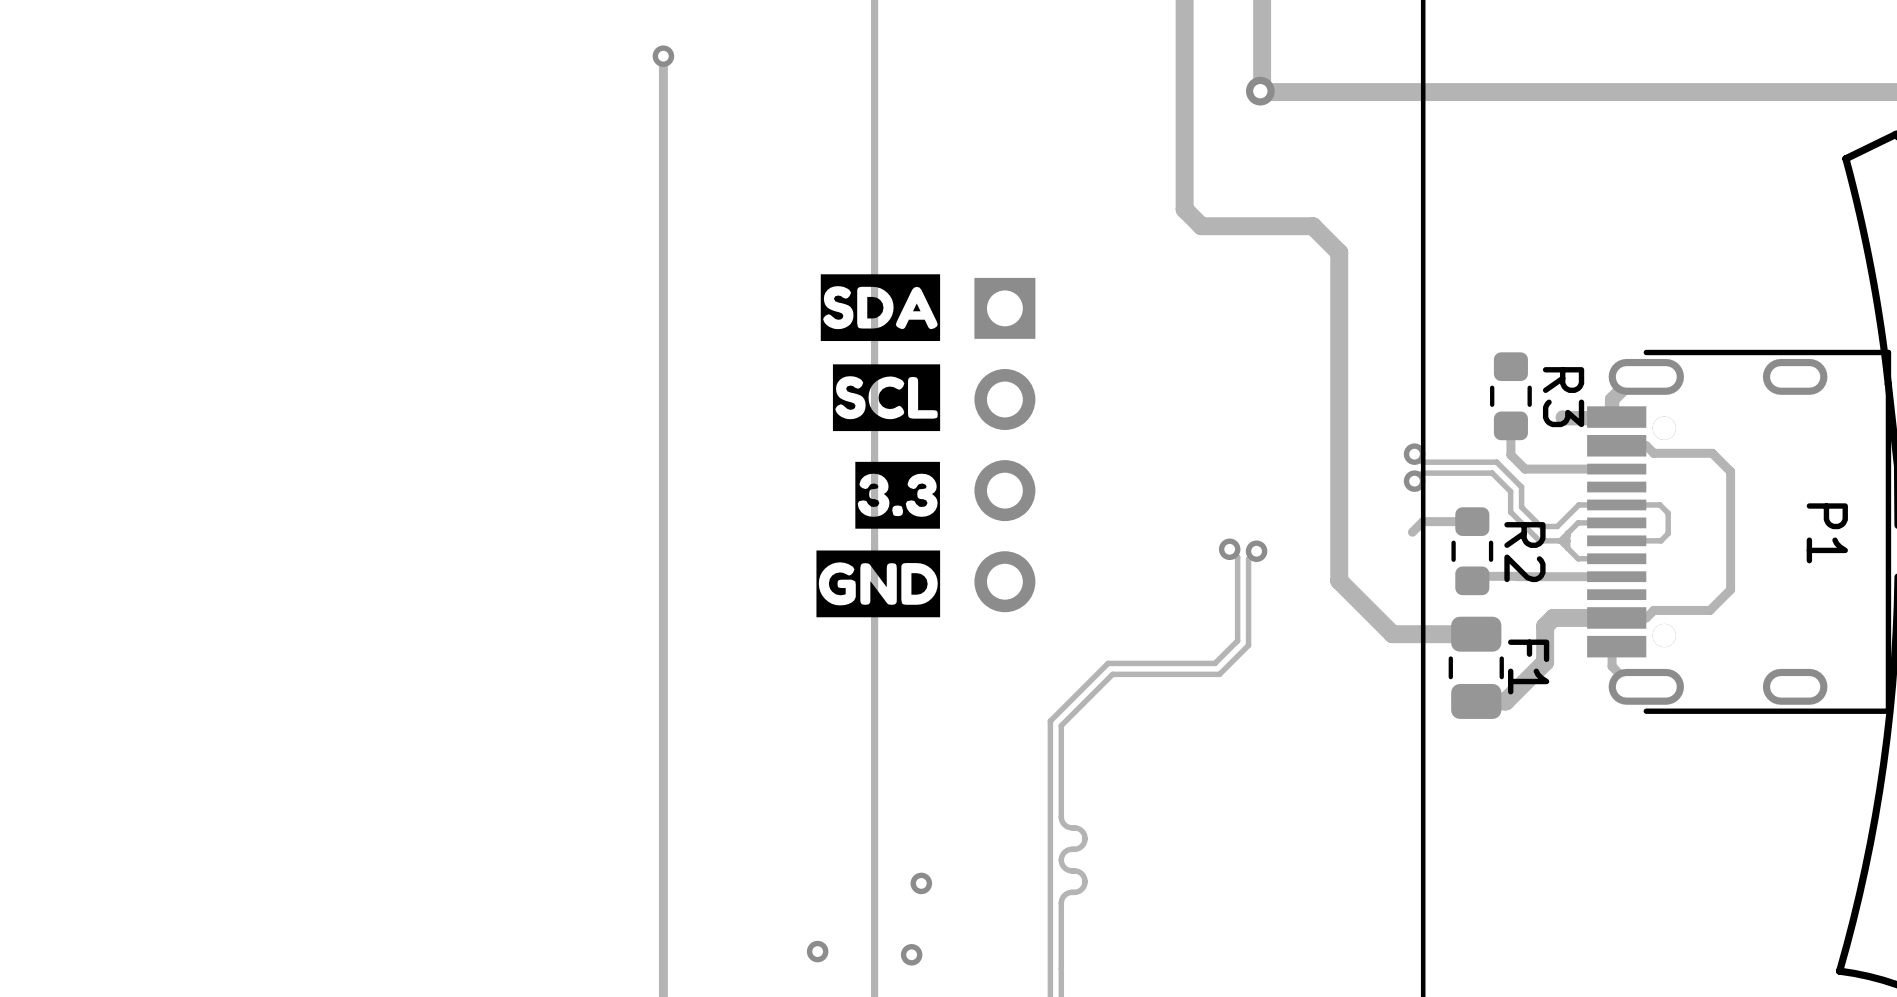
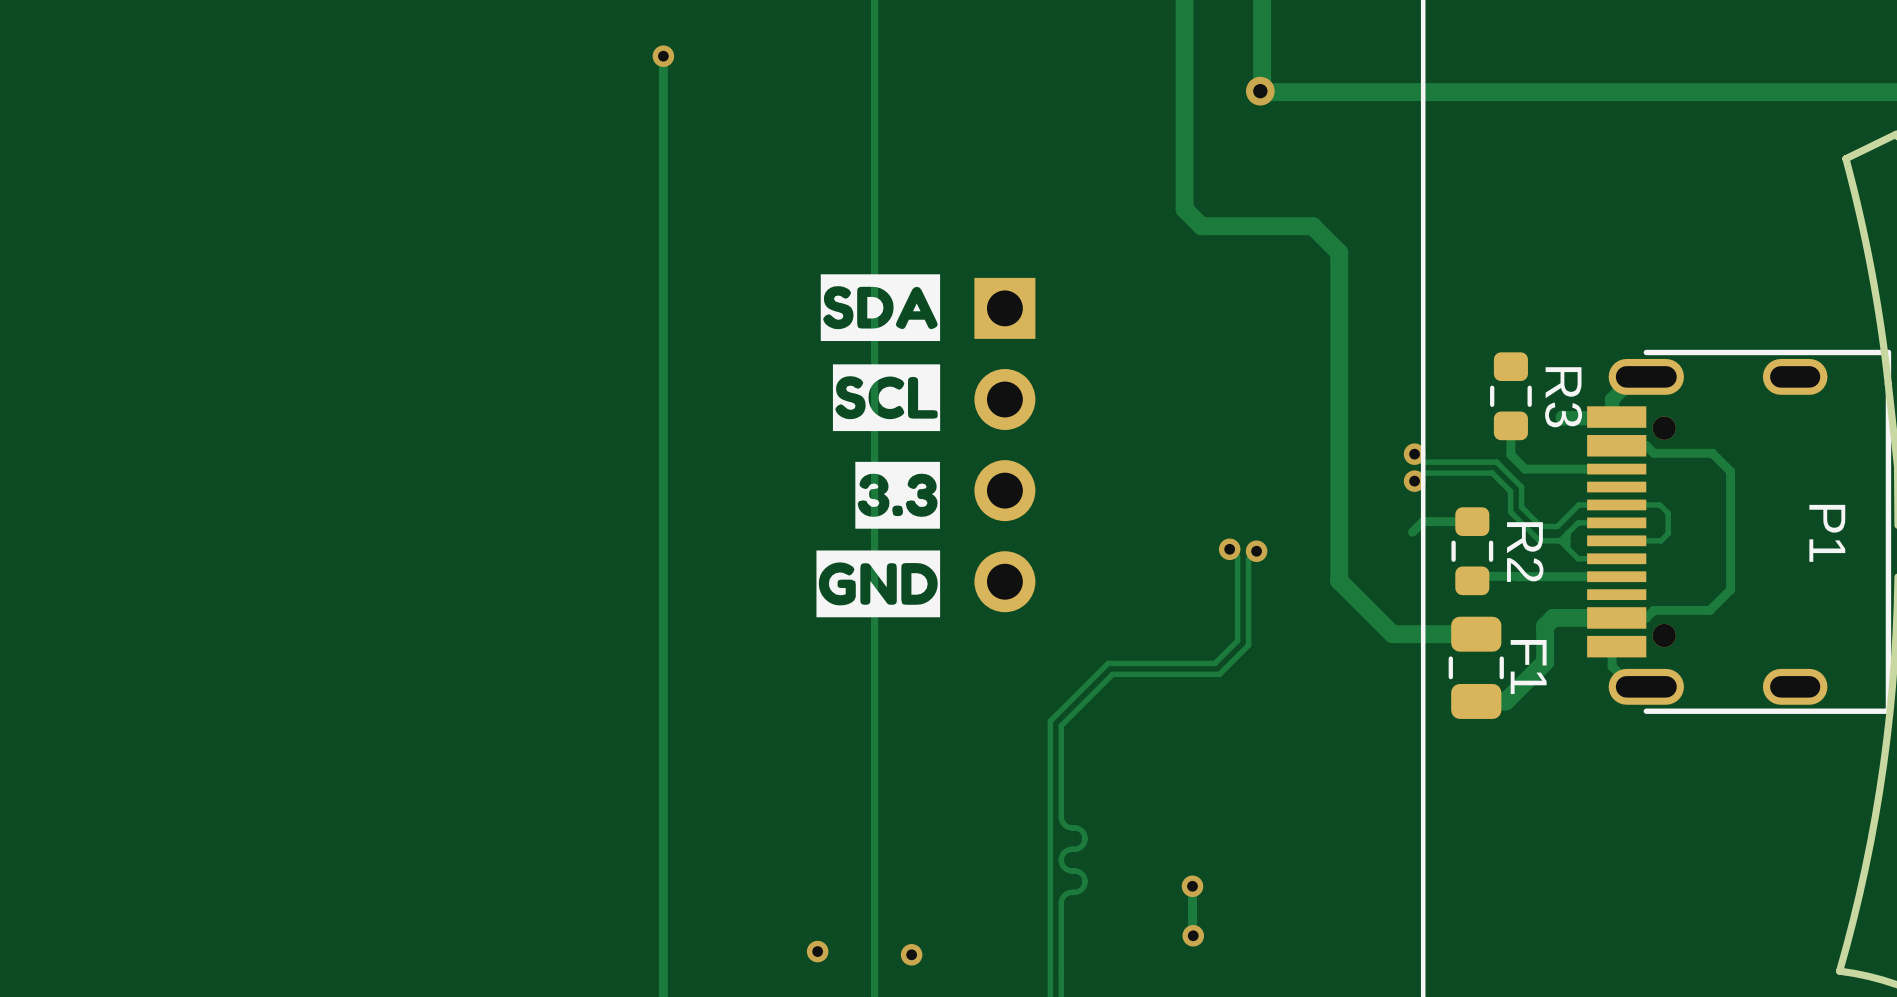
via: (921, 883) -> none
track: none -> (1192, 886) (1193, 935)
via: none -> (1192, 886)
via: none -> (1193, 935)

